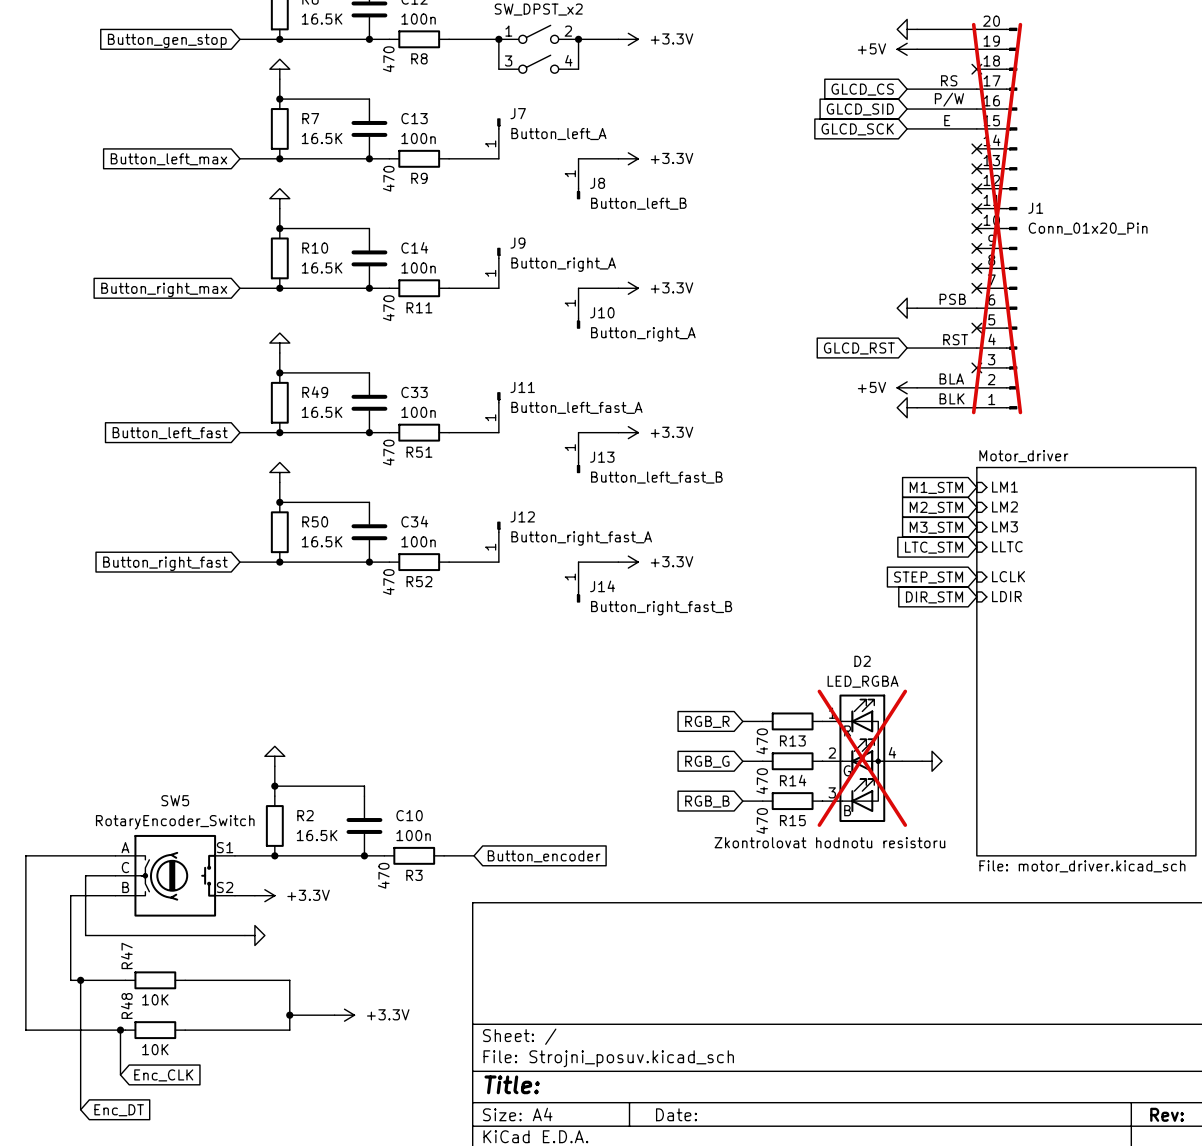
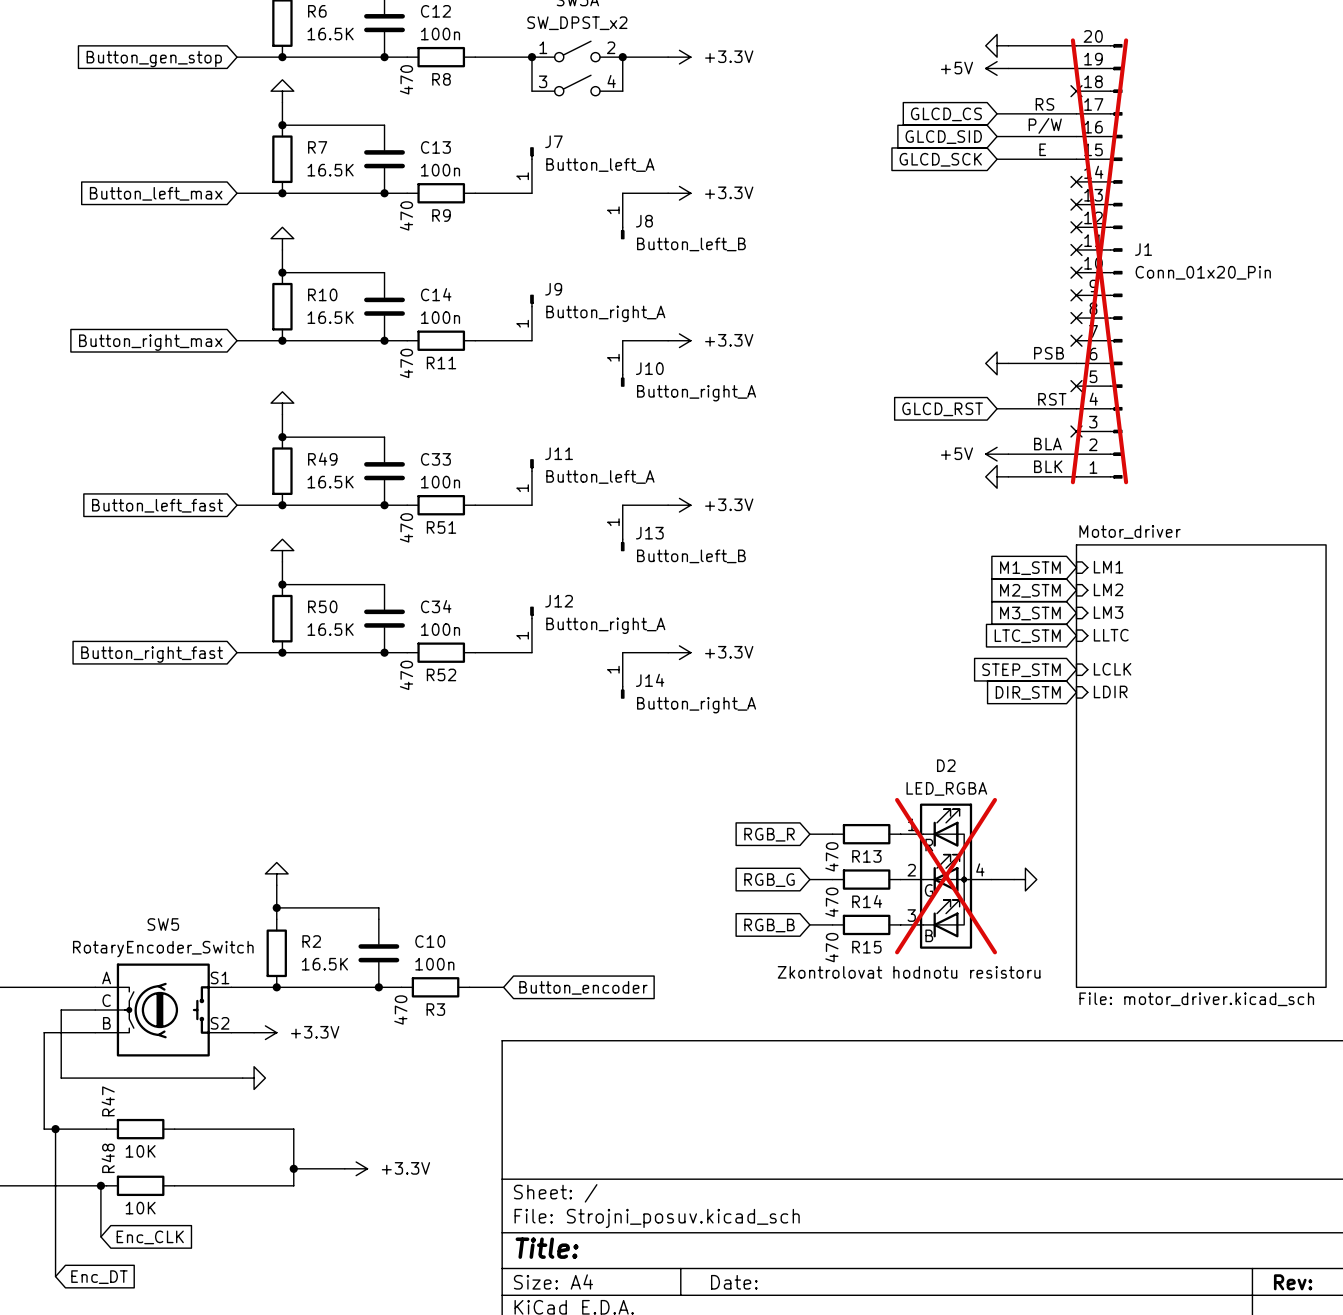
J11 value: Button_left_fast_A (576, 407) -> Button_left_A (600, 476)
J13 value: Button_left_fast_B (656, 477) -> Button_left_B (691, 556)
J12 value: Button_right_fast_A (581, 538) -> Button_right_A (605, 625)
J14 value: Button_right_fast_B (661, 608) -> Button_right_A (696, 705)

